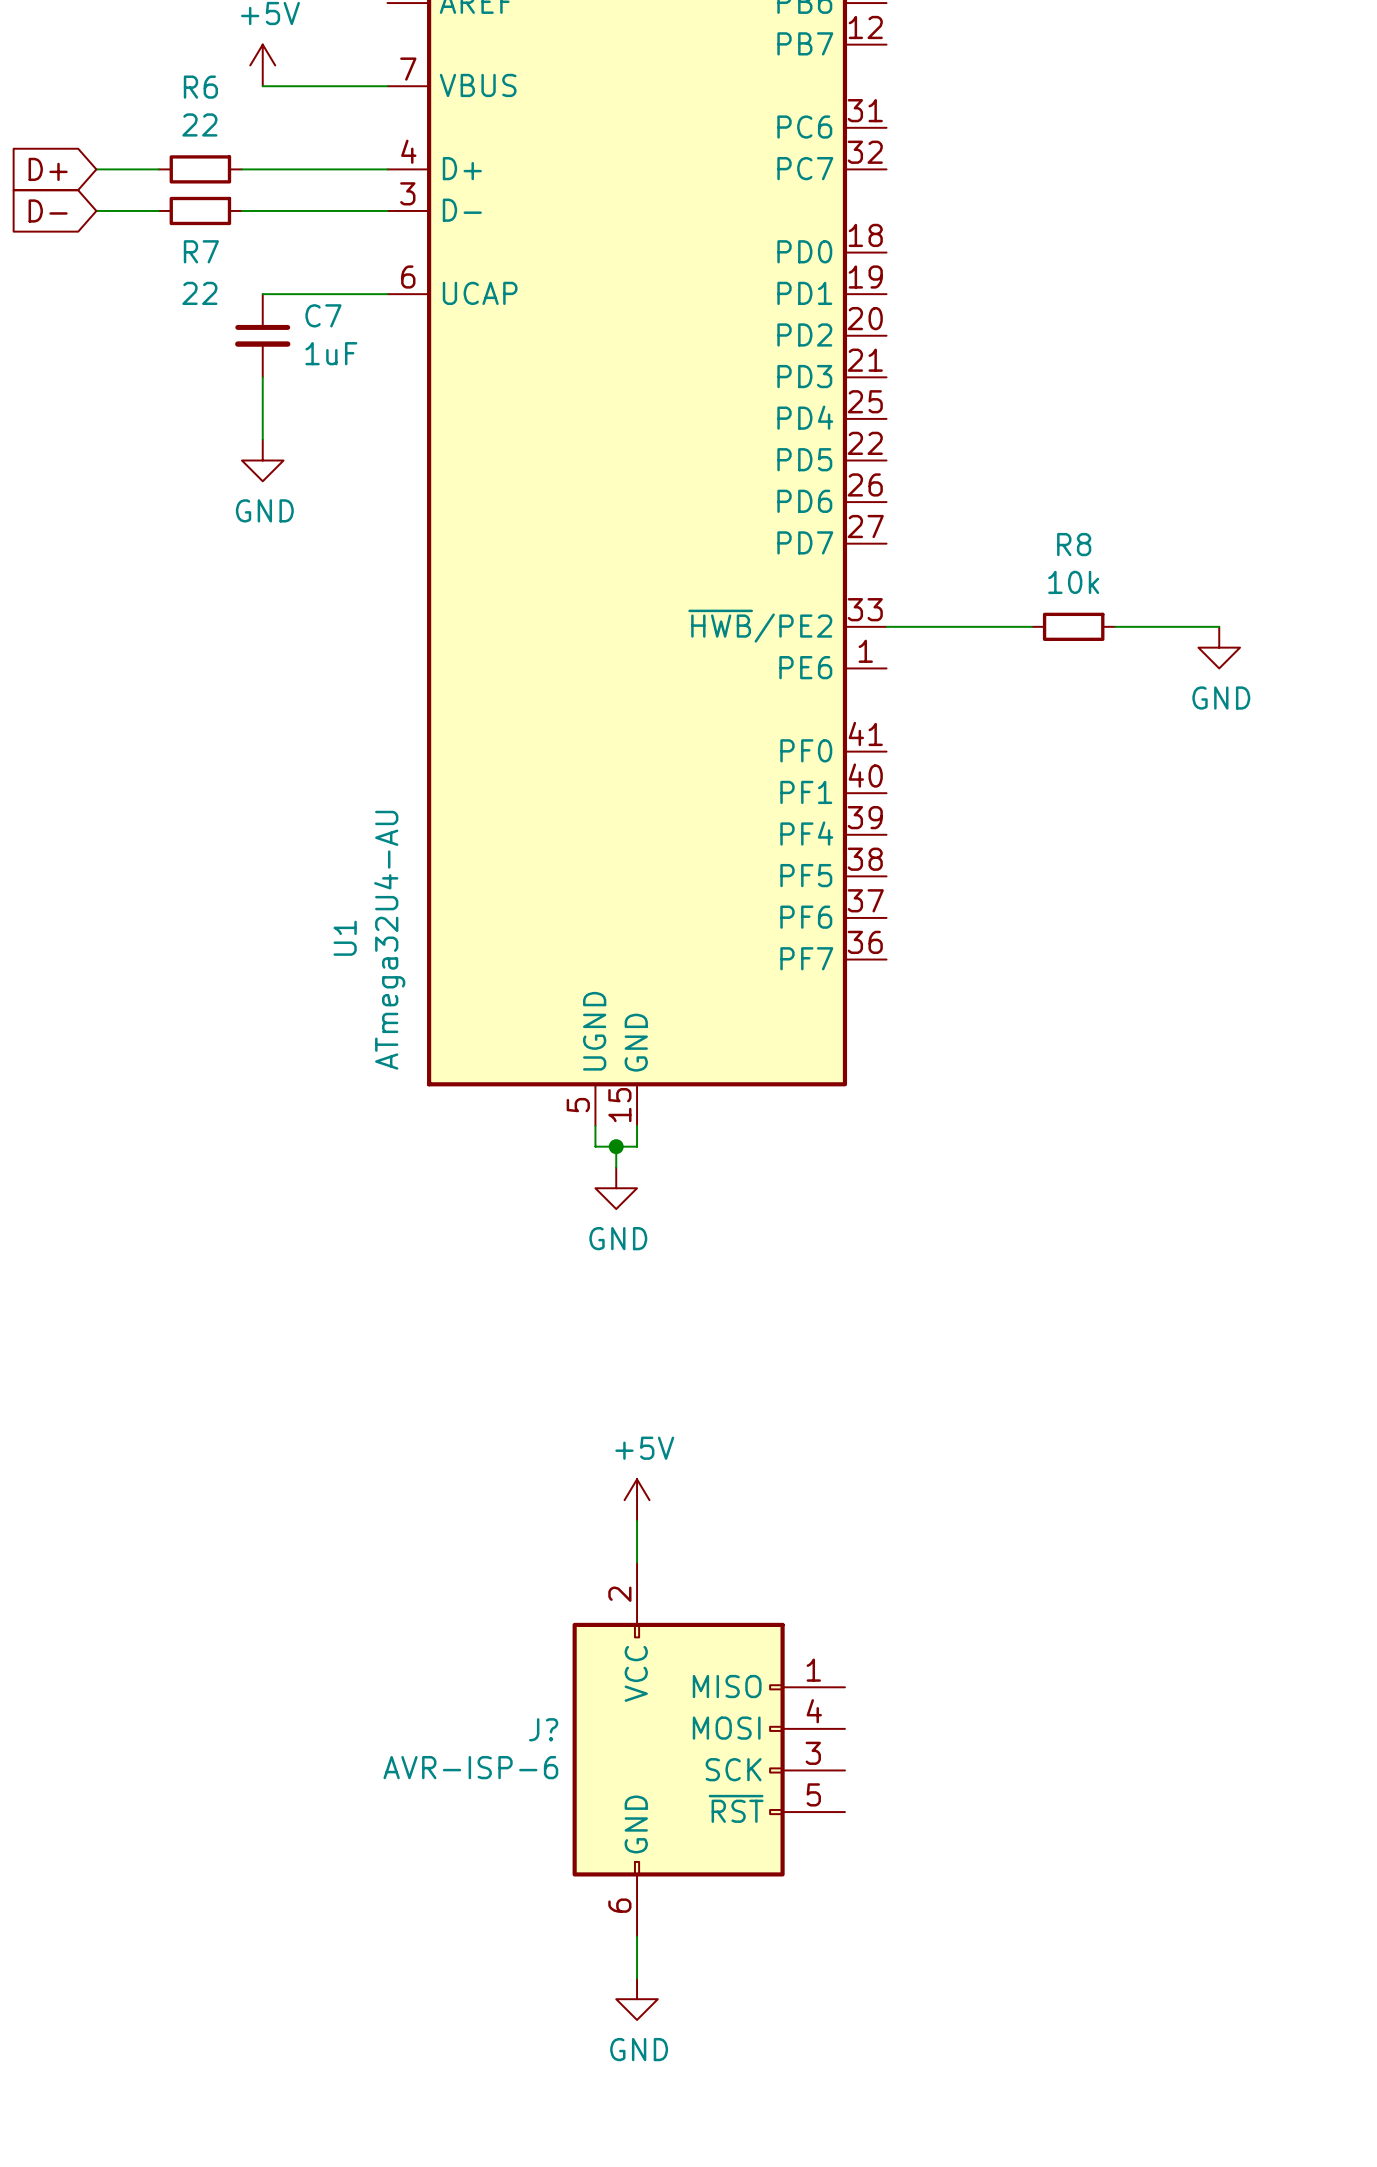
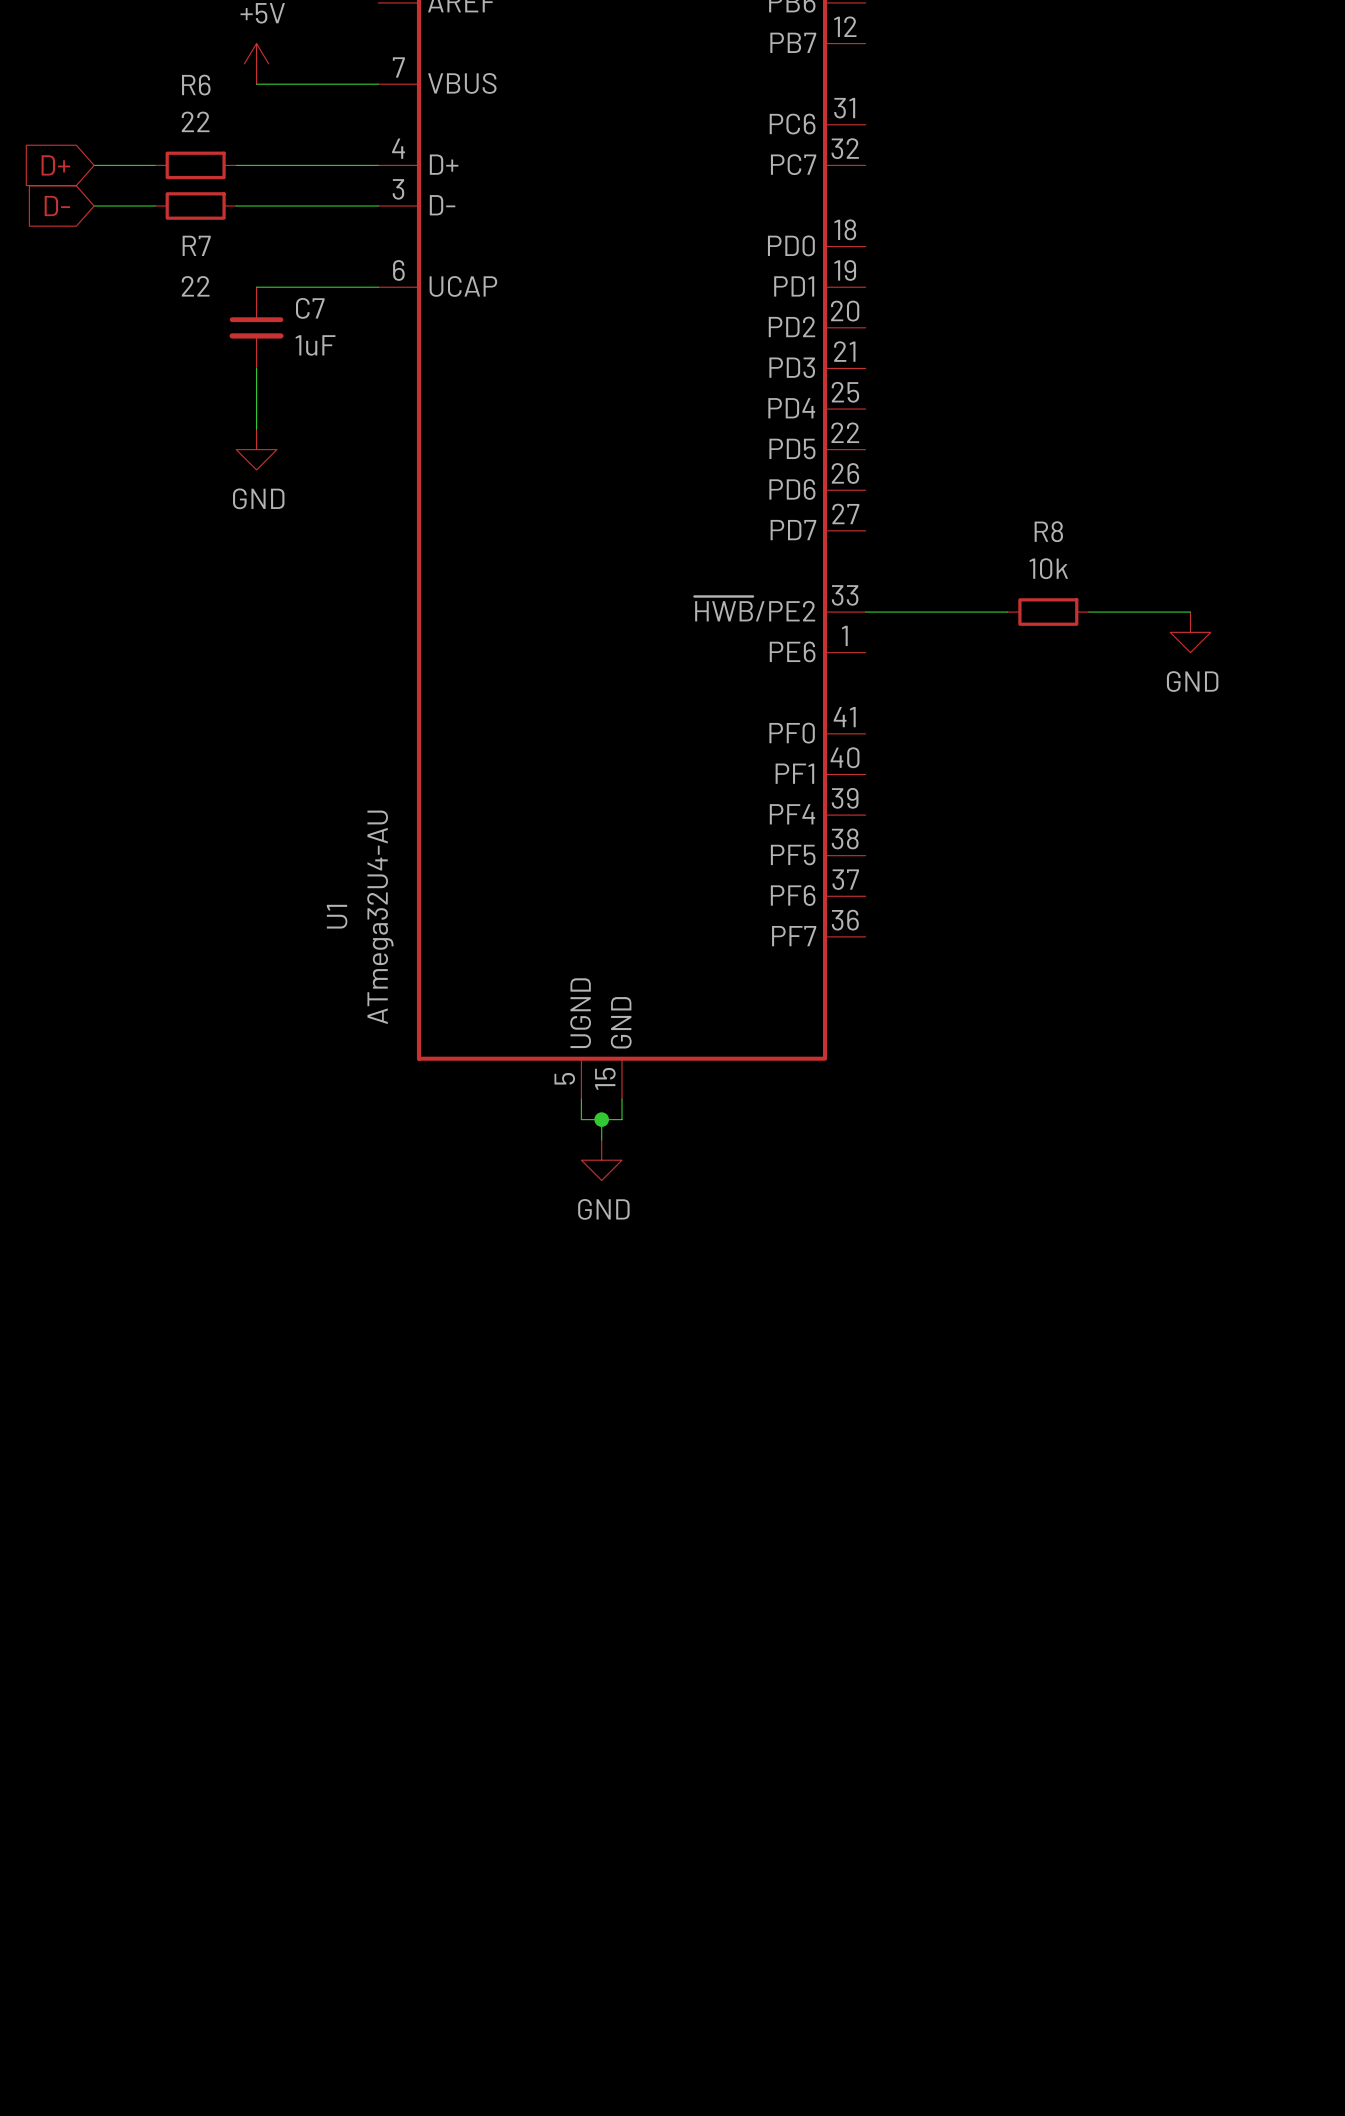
power symbol: +5V (637, 1500) -> none
wire: (637, 1520) (637, 1562) -> none
J?: AVR-ISP-6 (708, 1749) -> none
wire: (637, 1936) (637, 1978) -> none
power symbol: GND (637, 1999) -> none

